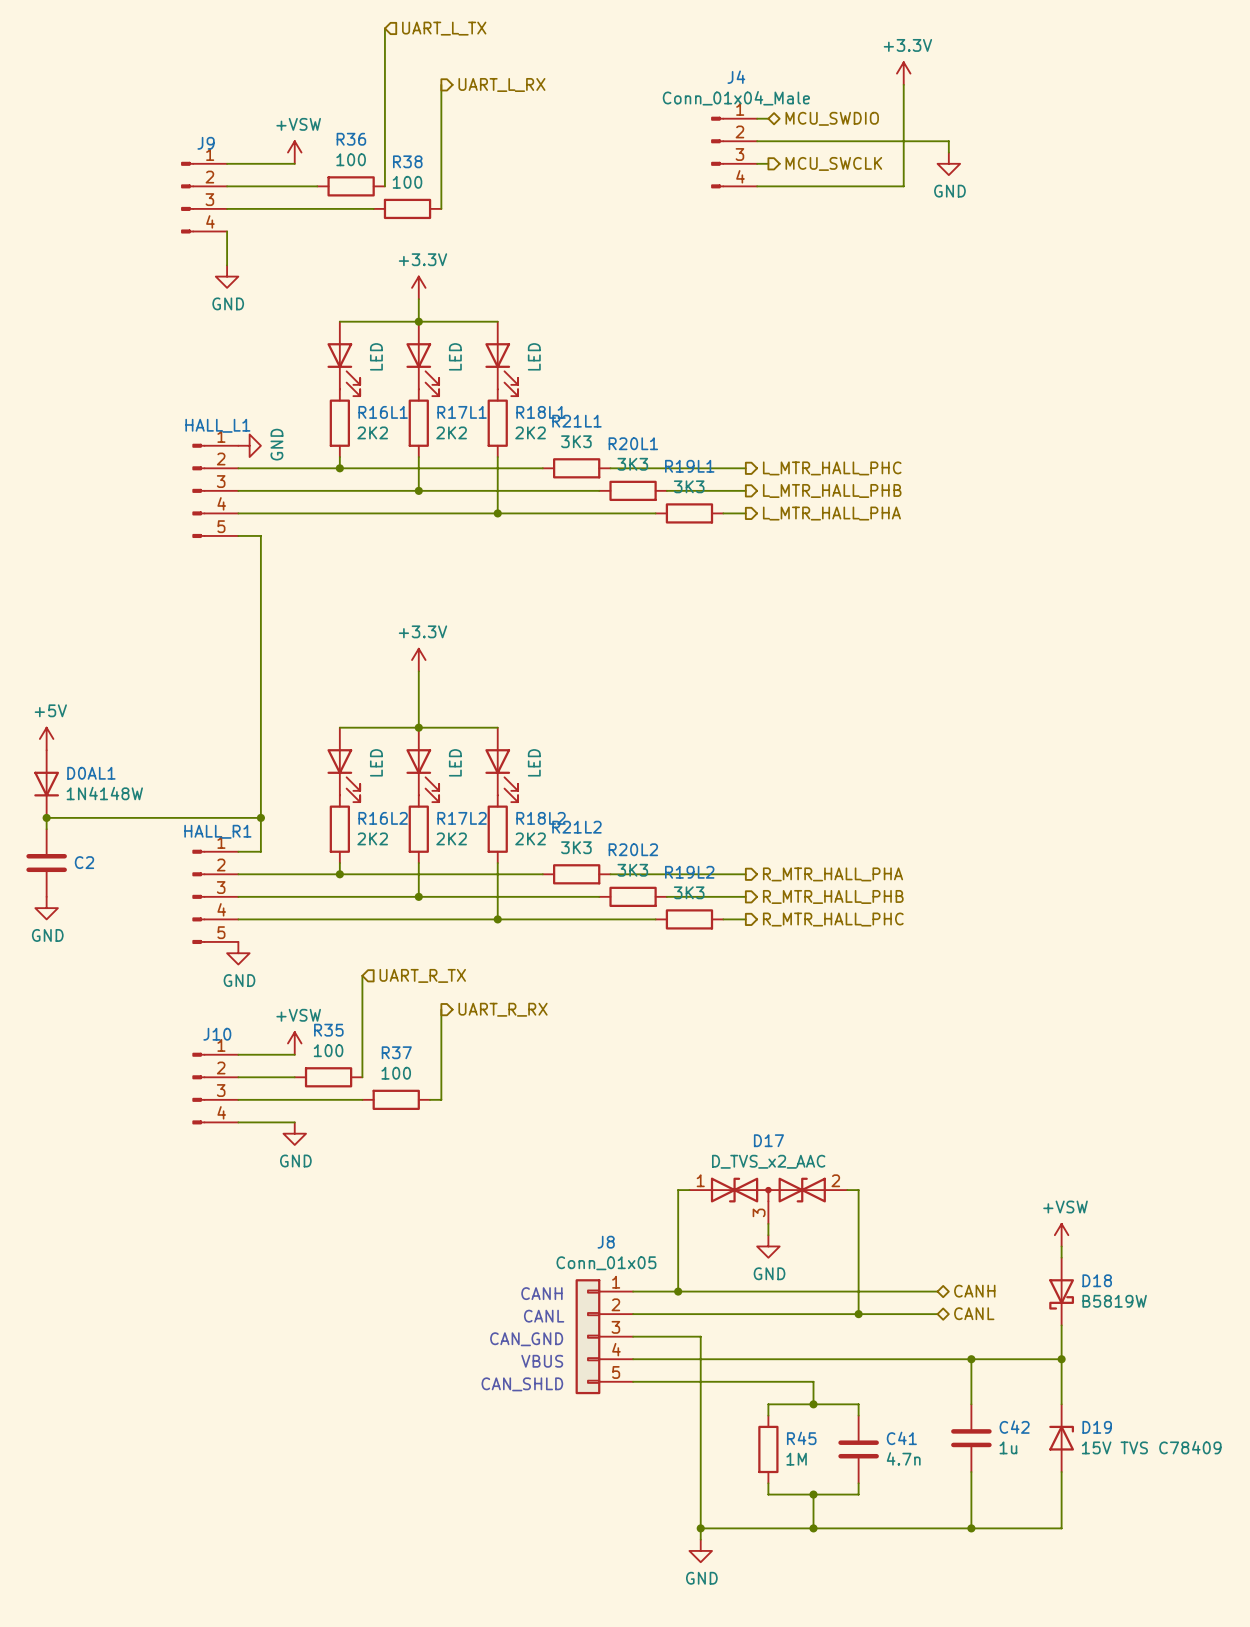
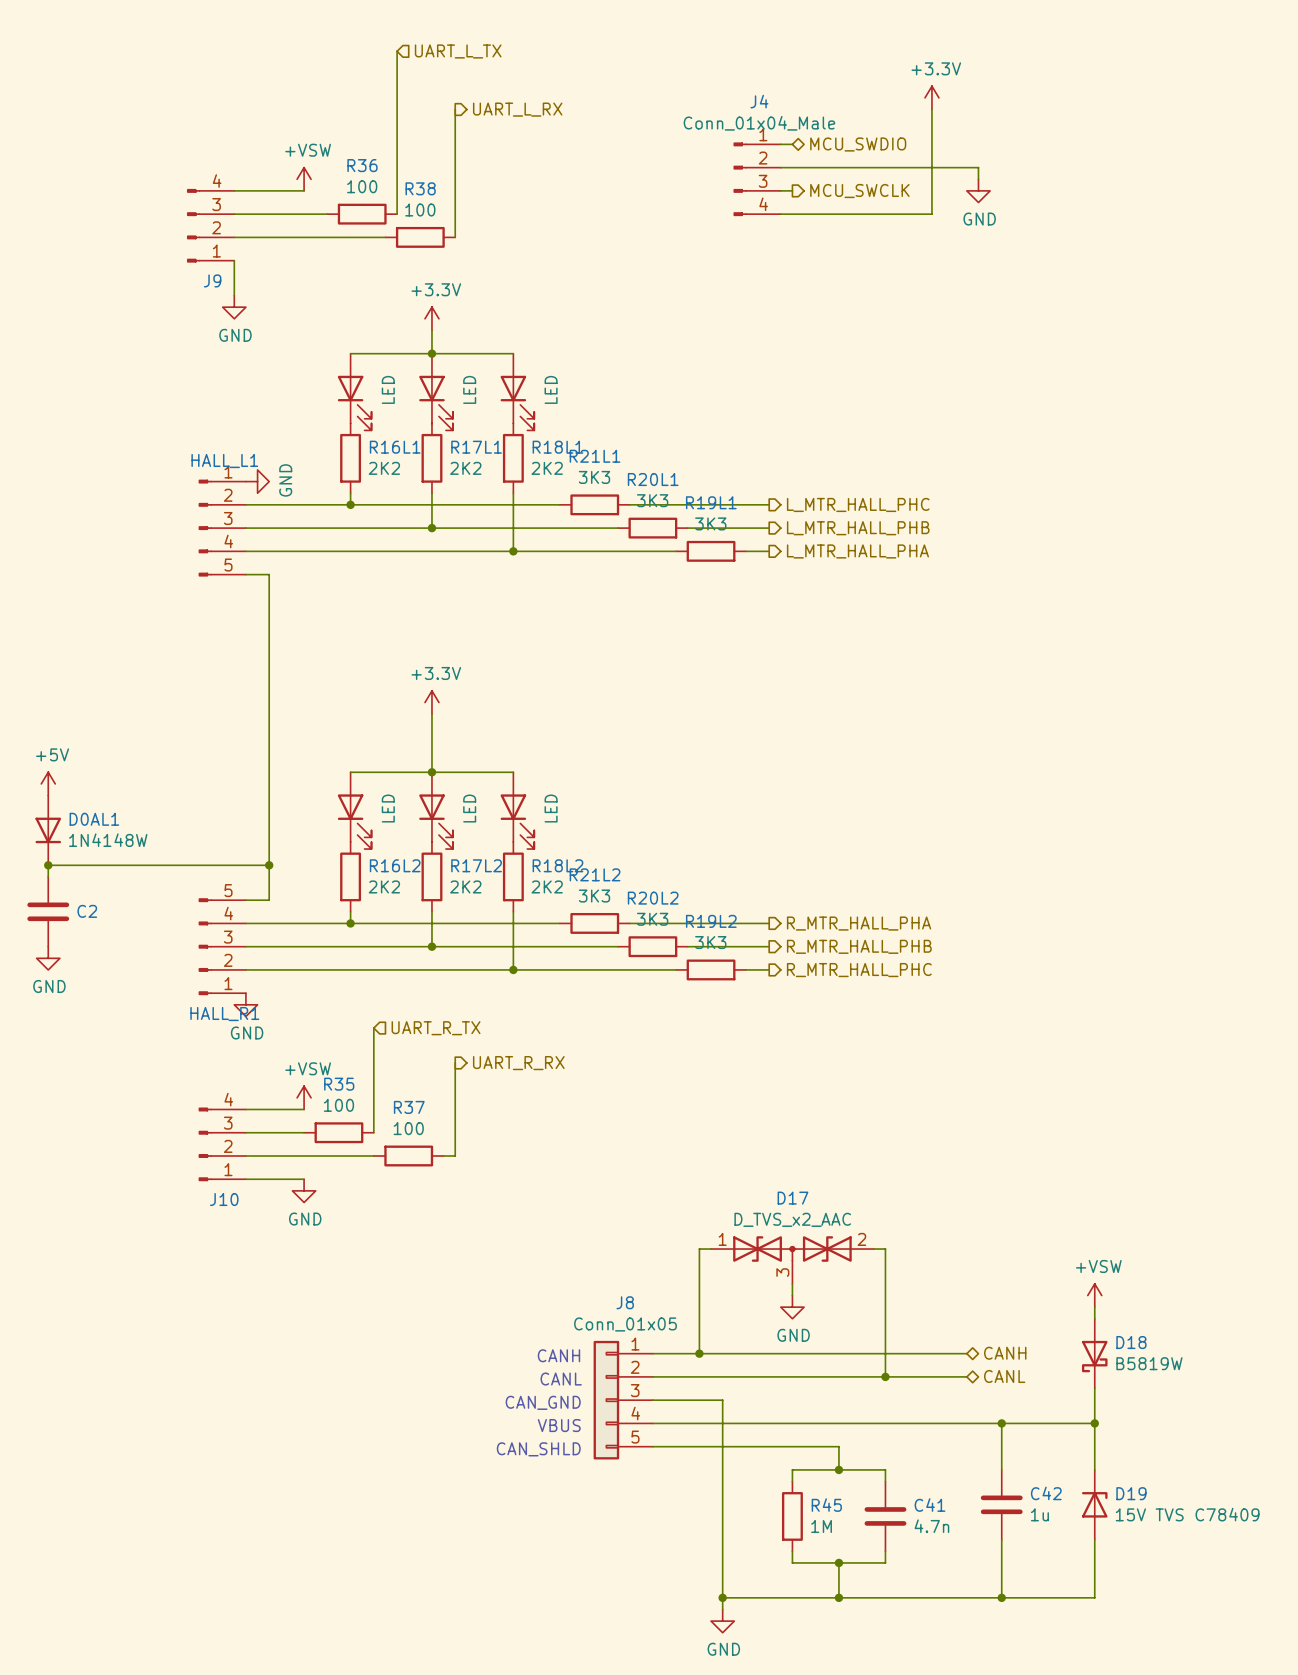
J9 flip: as is (187, 197) -> up-down (193, 225)
HALL_R1 flip: as is (198, 896) -> up-down (205, 946)
J10 flip: as is (198, 1088) -> up-down (205, 1144)

